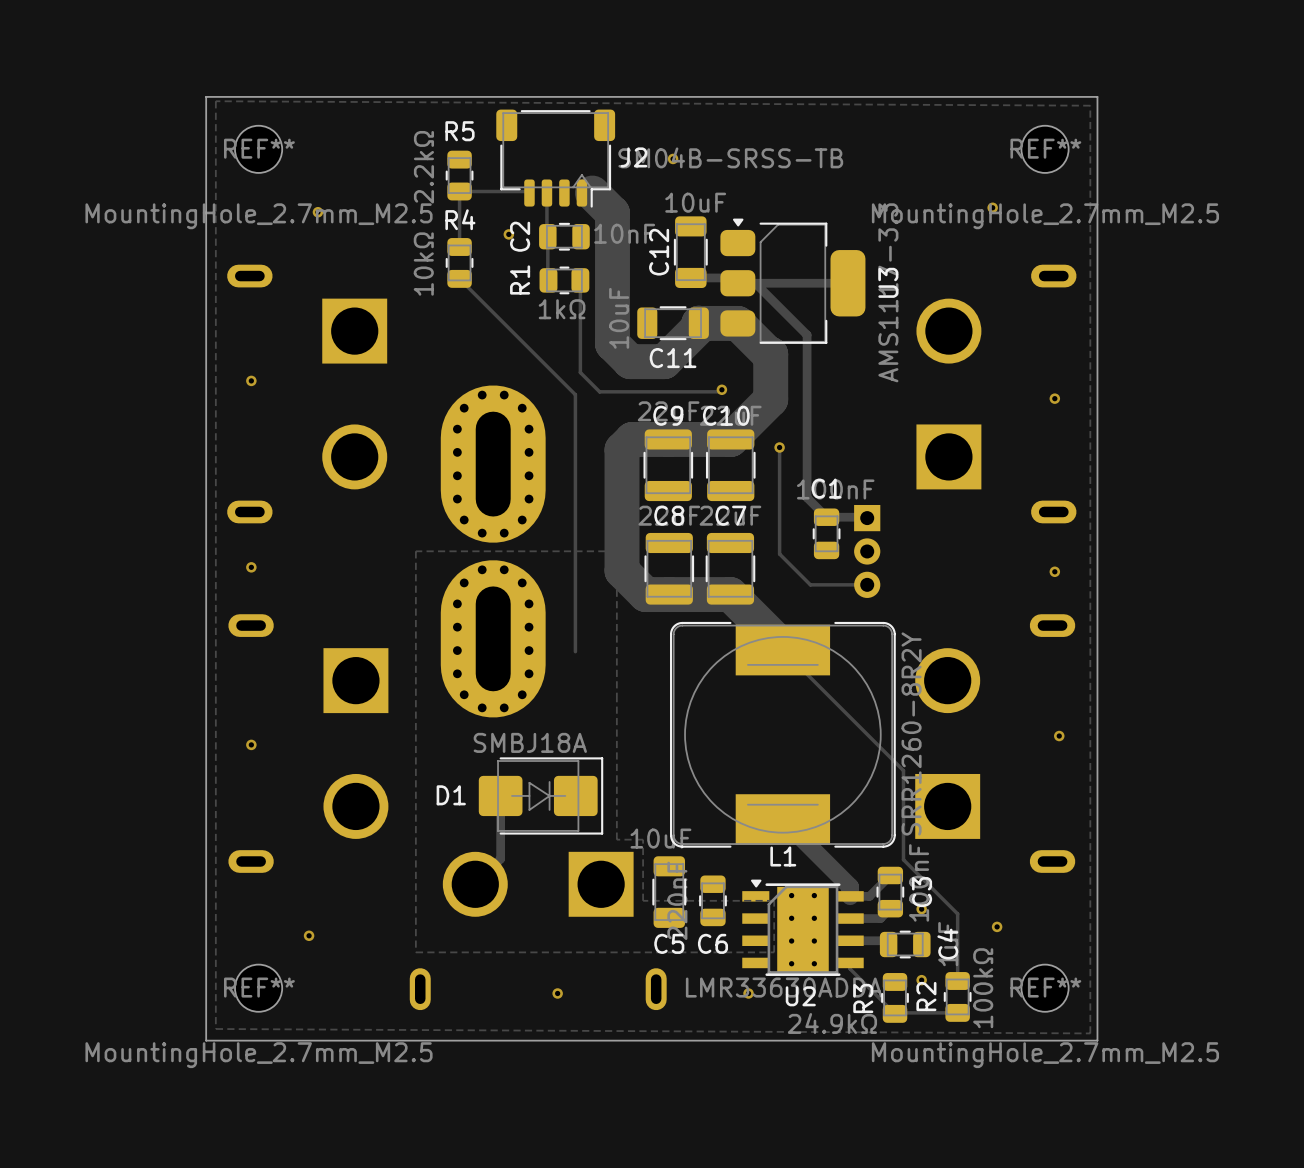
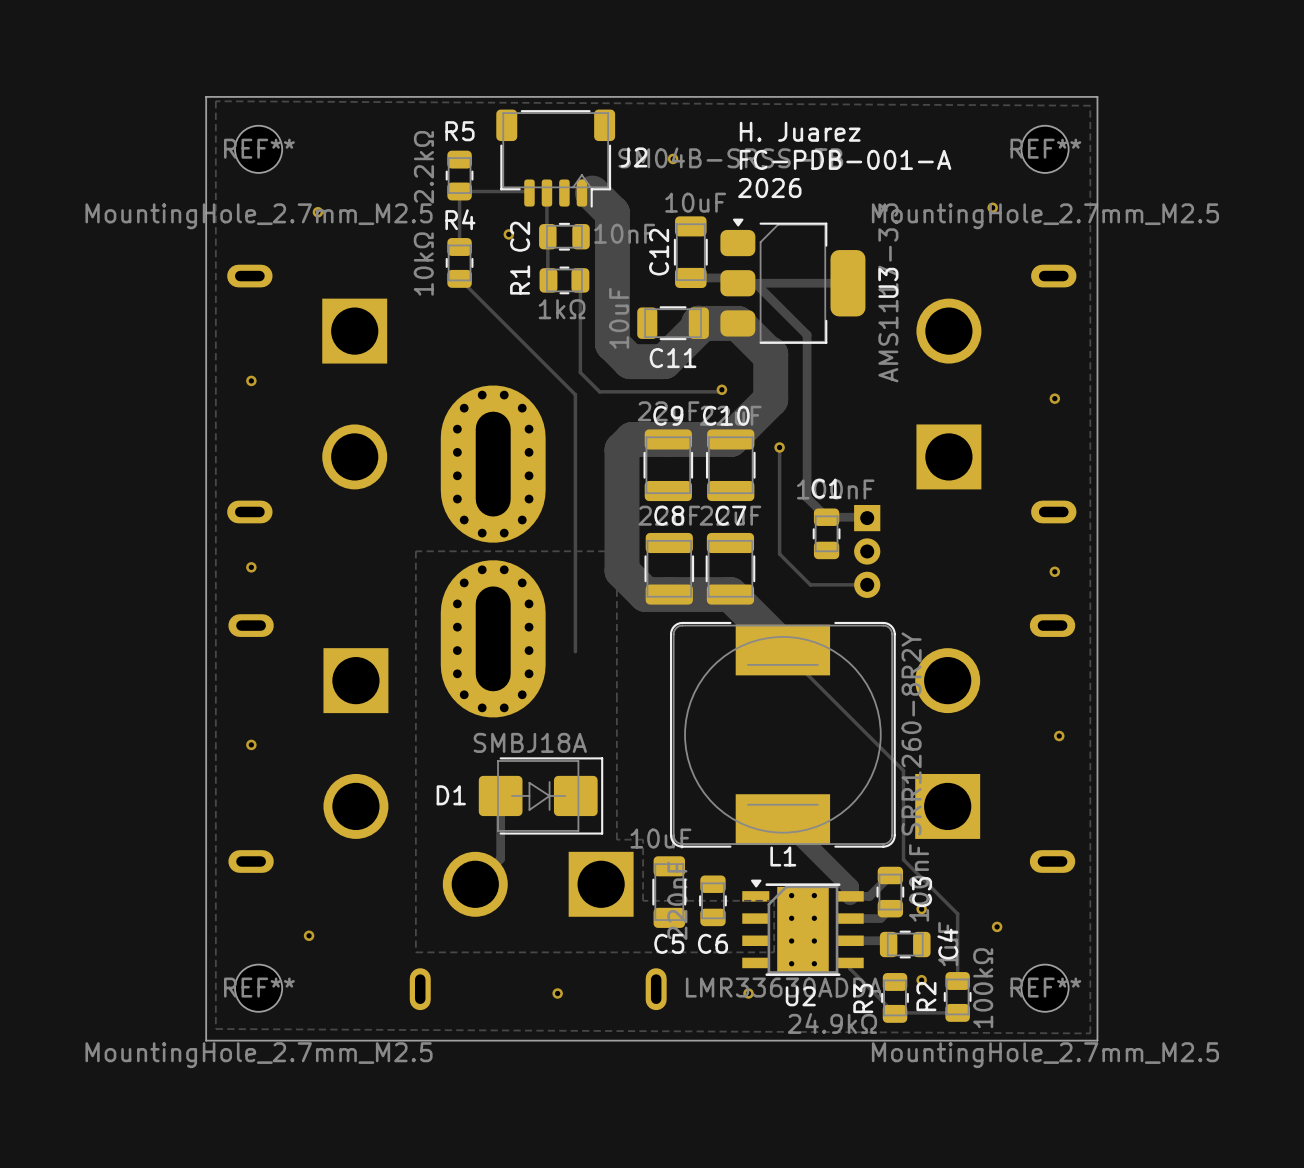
text: none -> H. Juarez (800, 131)
text: none -> FC-PDB-001-A (845, 159)
text: none -> 2026 (769, 188)

